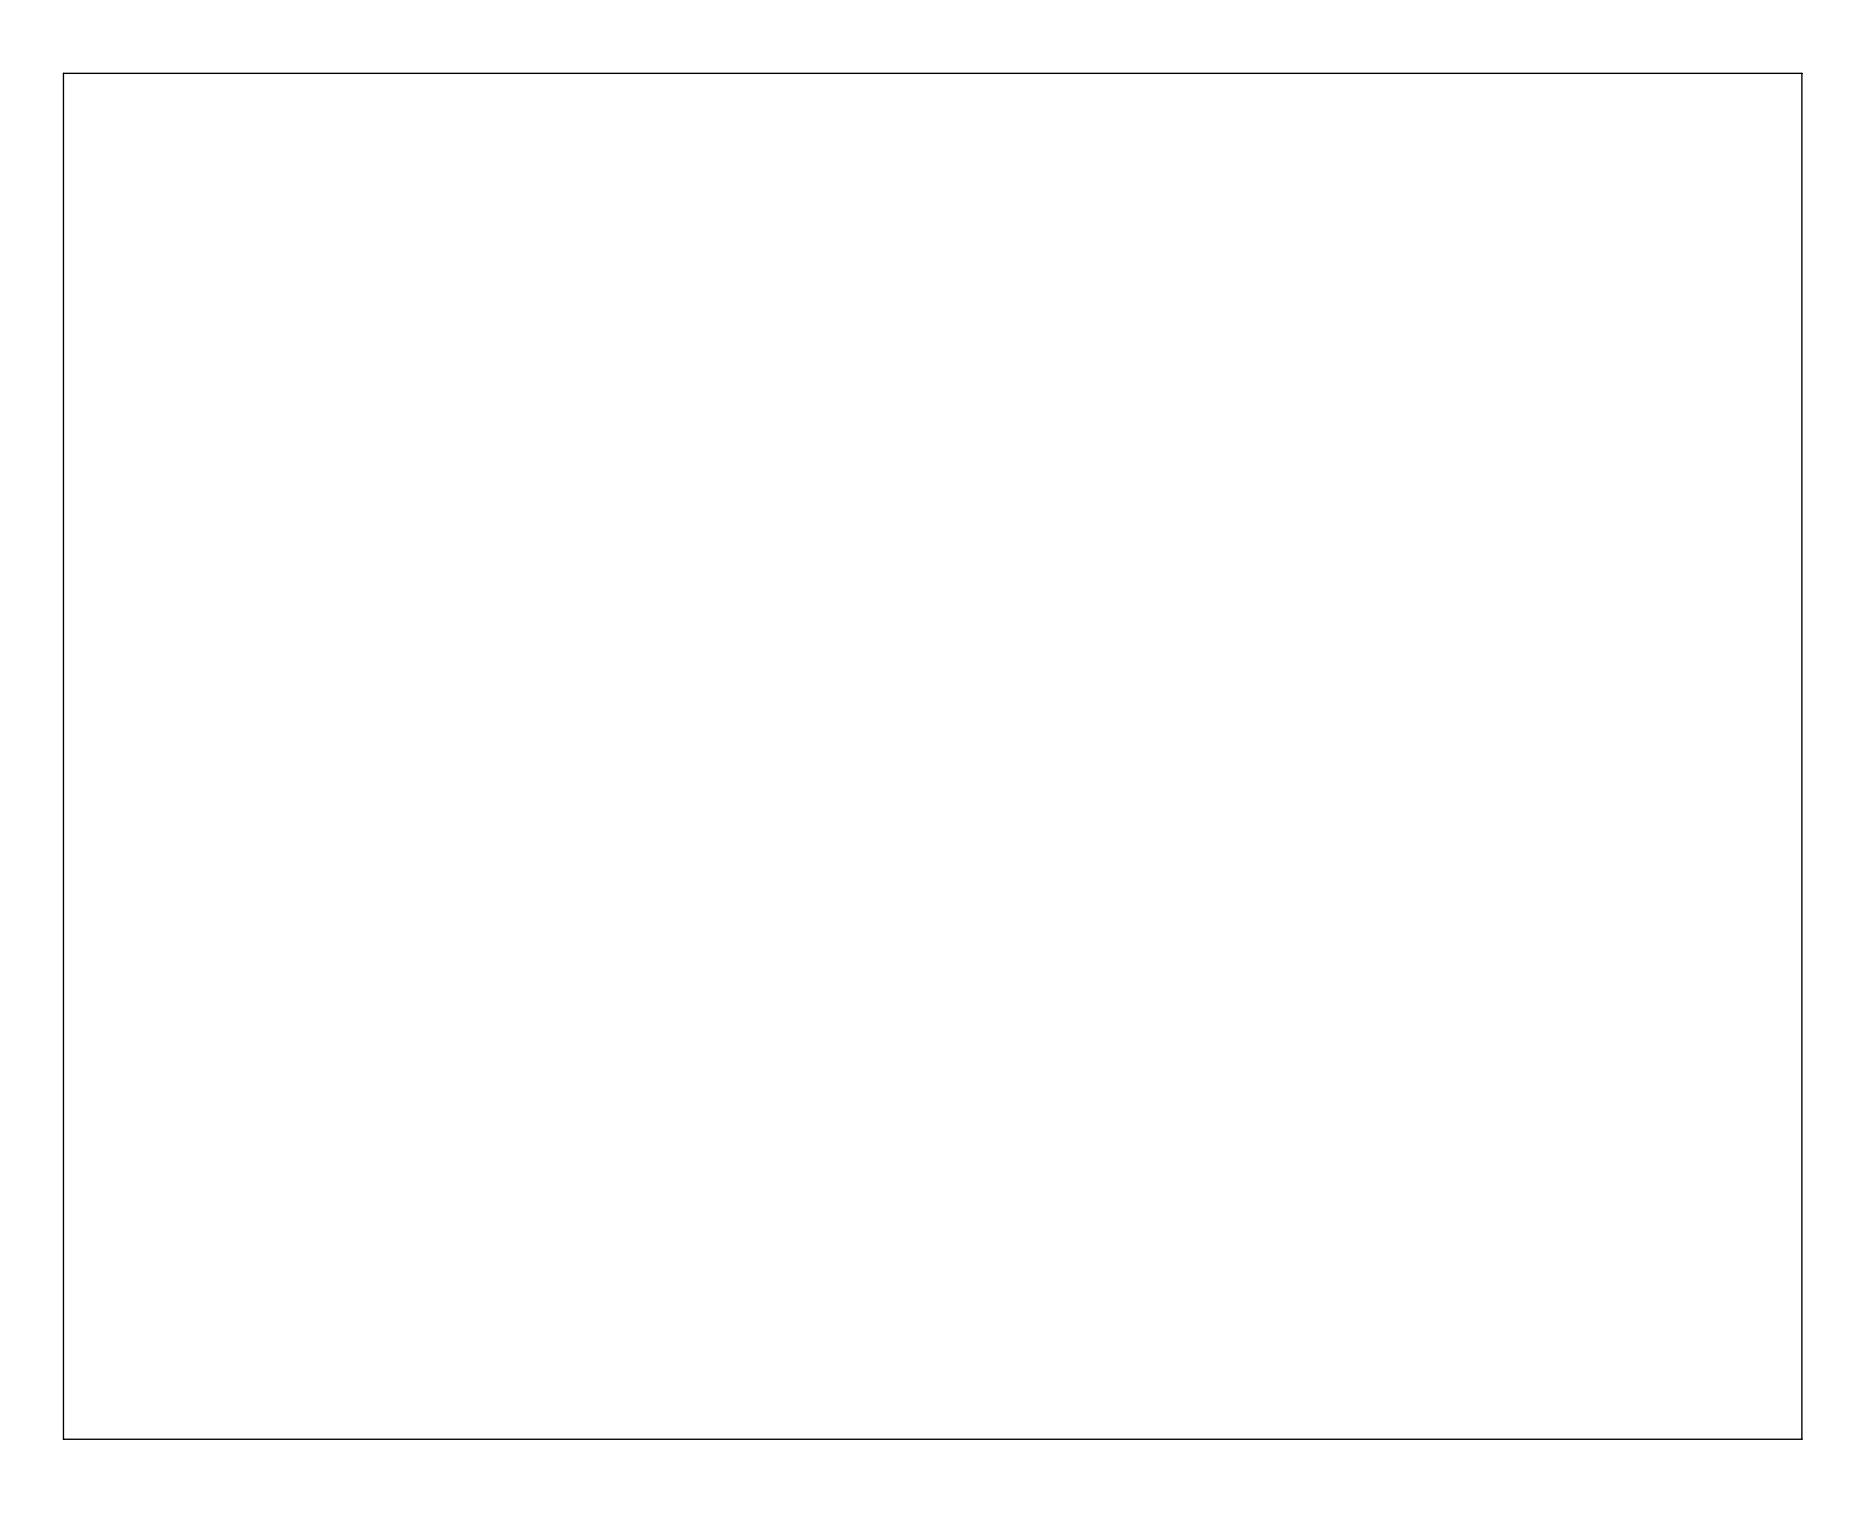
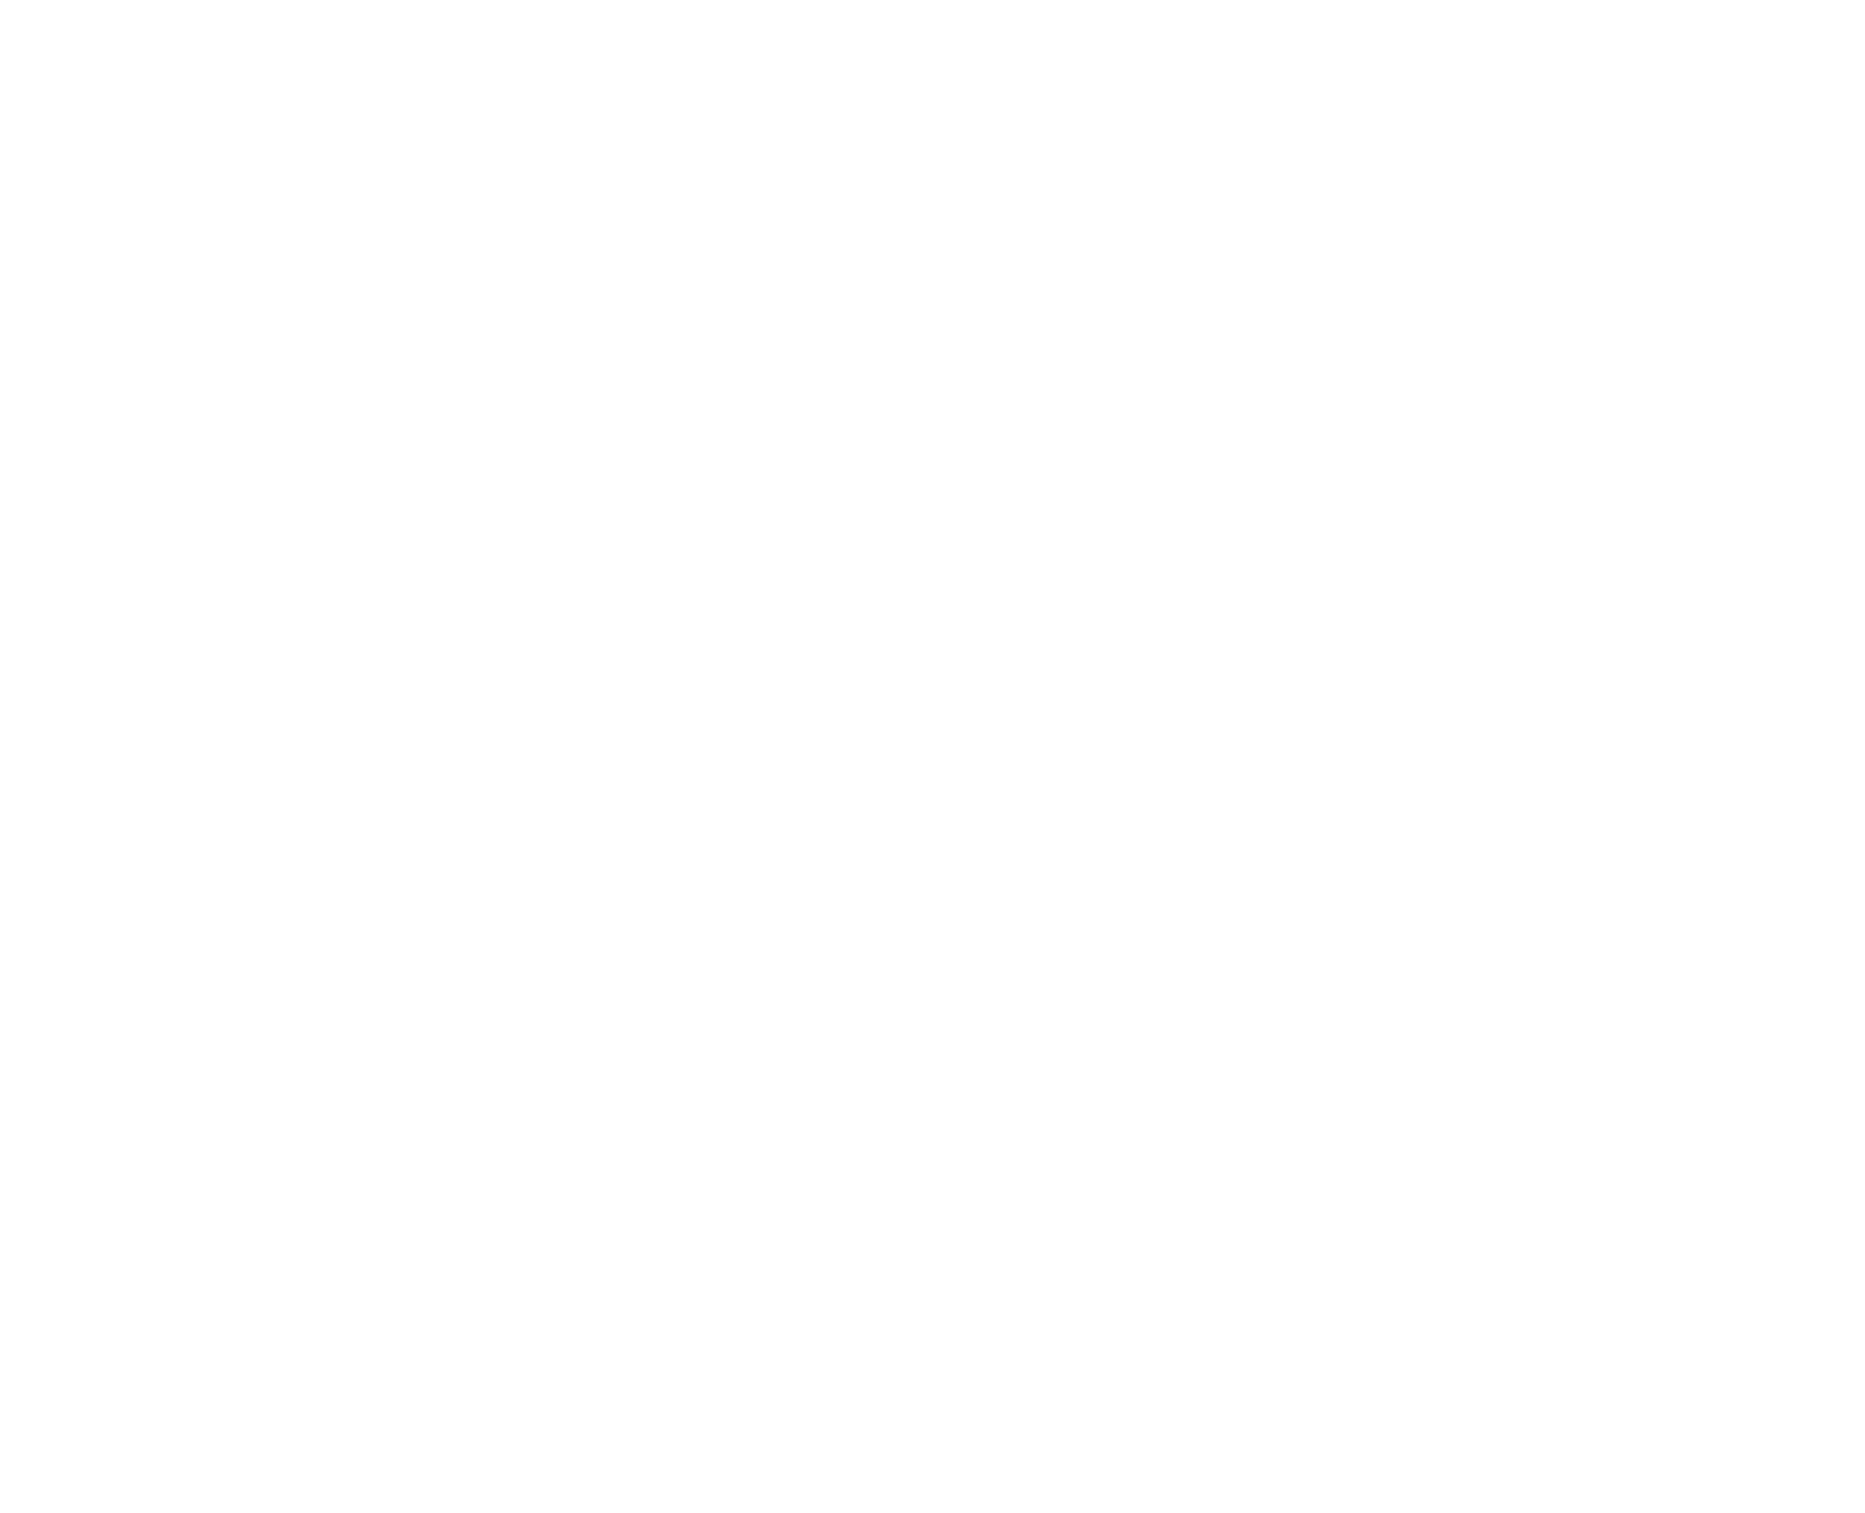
board edge: (1801, 73) (63, 73) (63, 1439) (1801, 1439) (1801, 73) -> none

